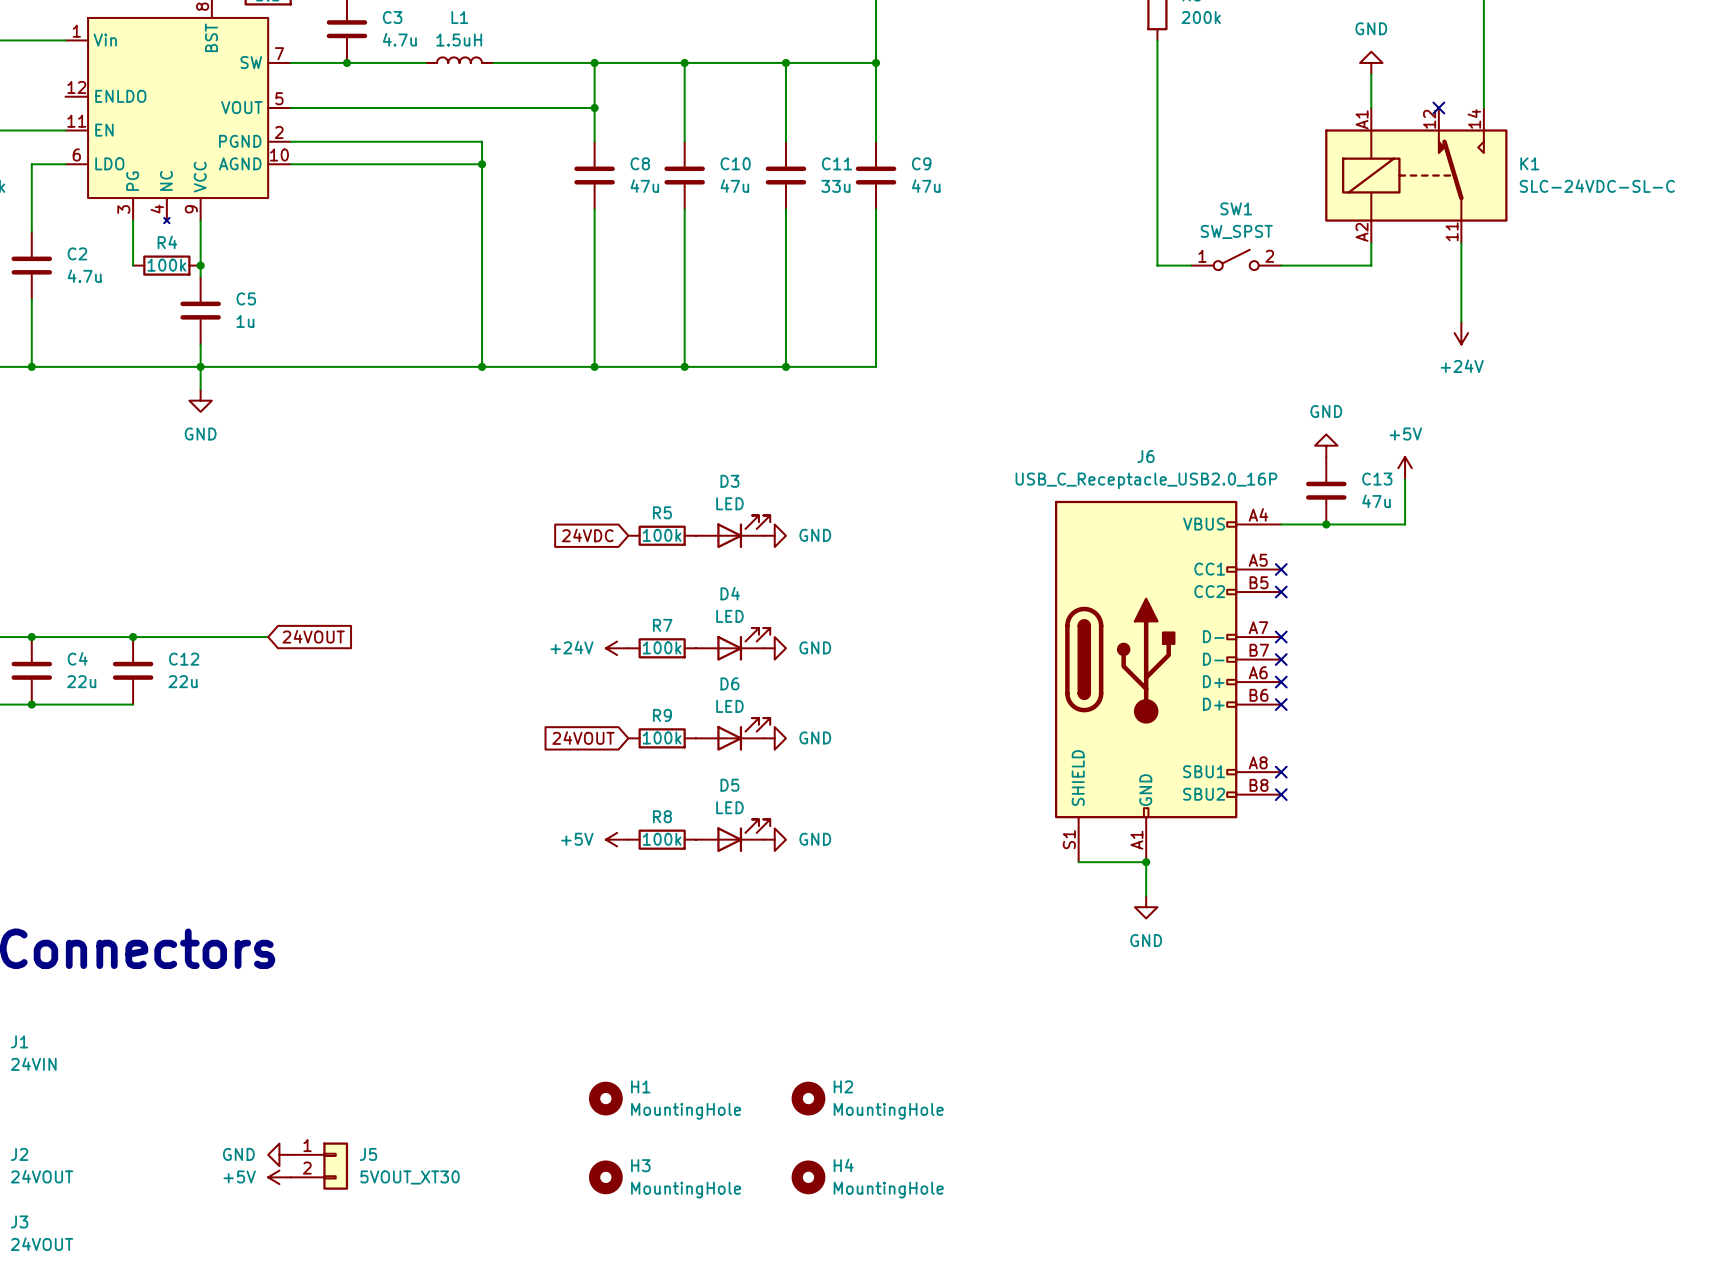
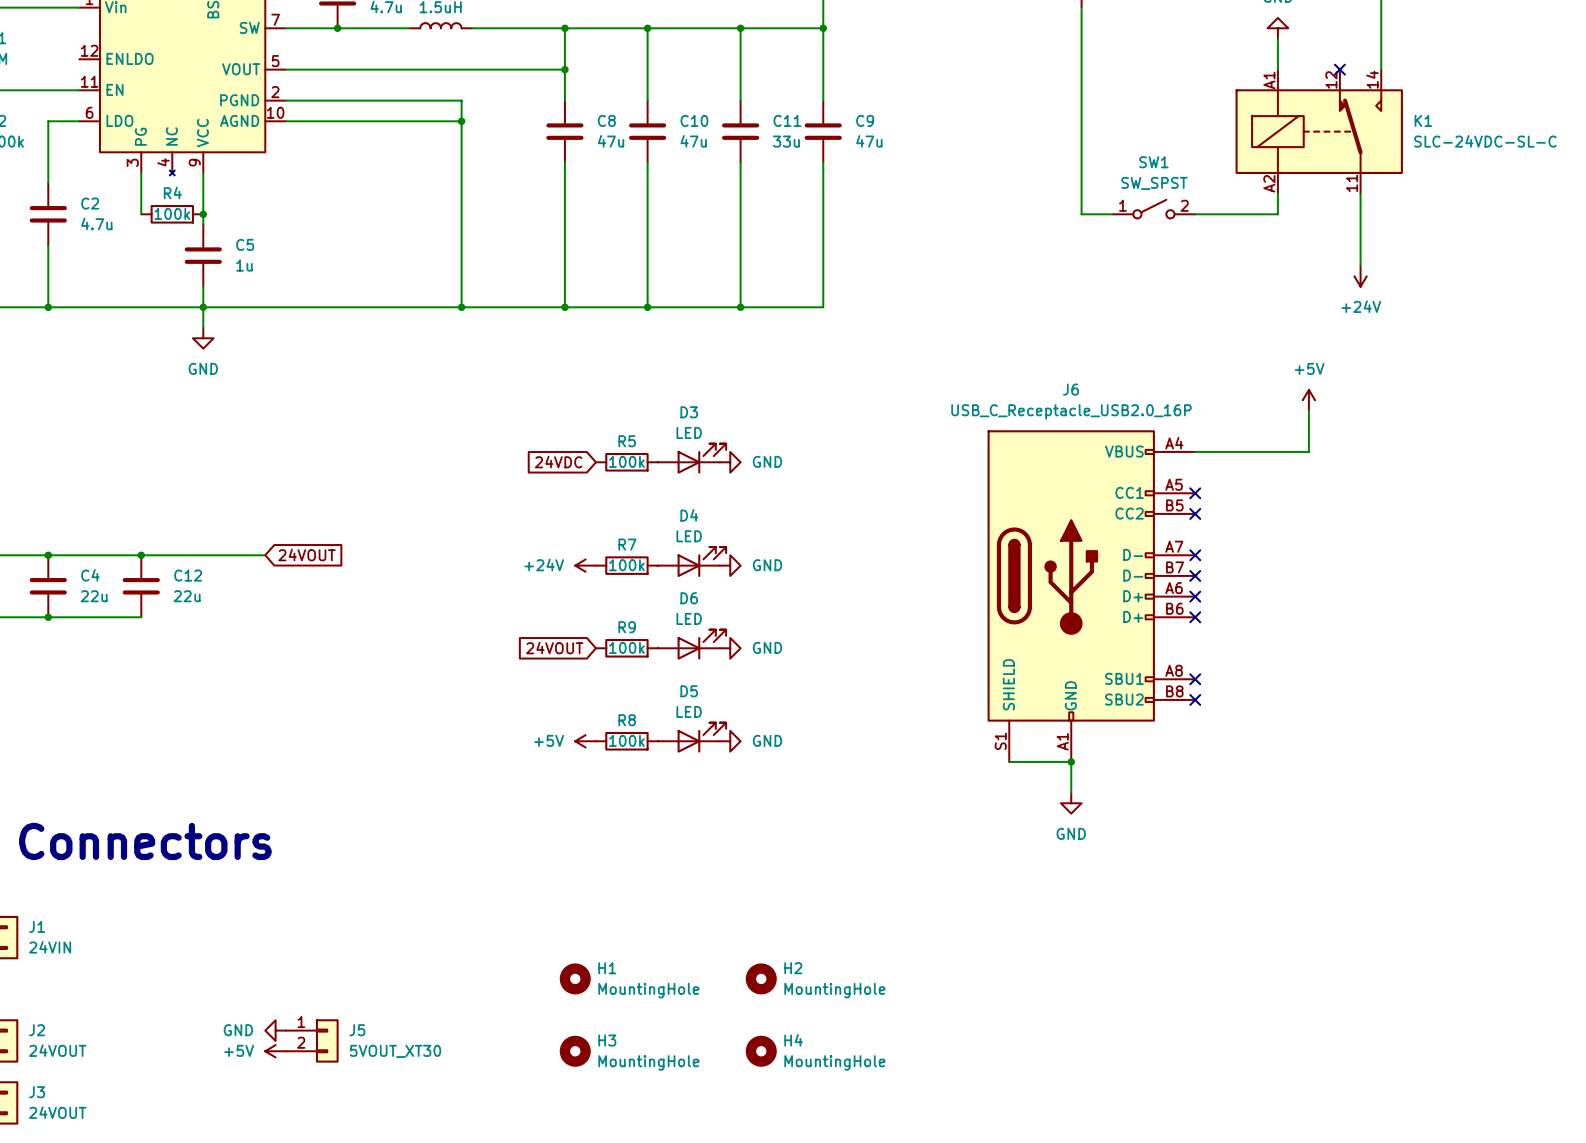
power symbol: GND (1326, 445) -> none
C13: 47u (1326, 490) -> none
junction: (1326, 524) -> none

